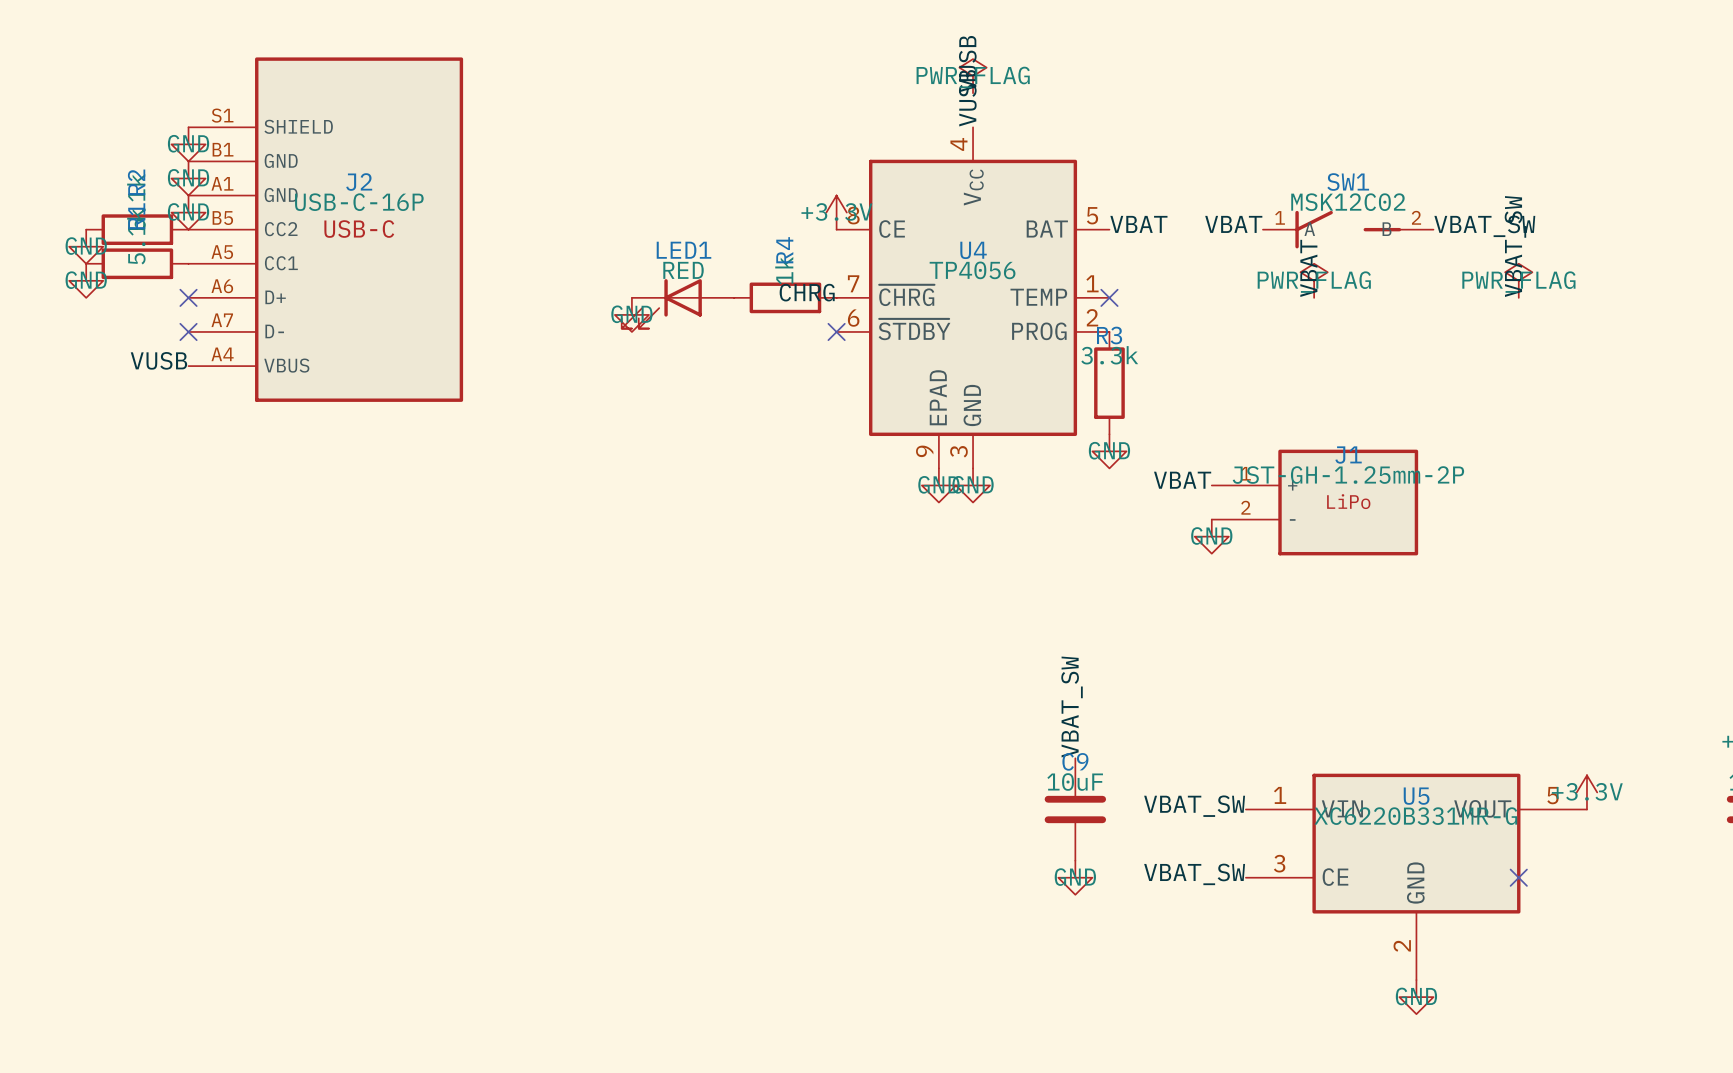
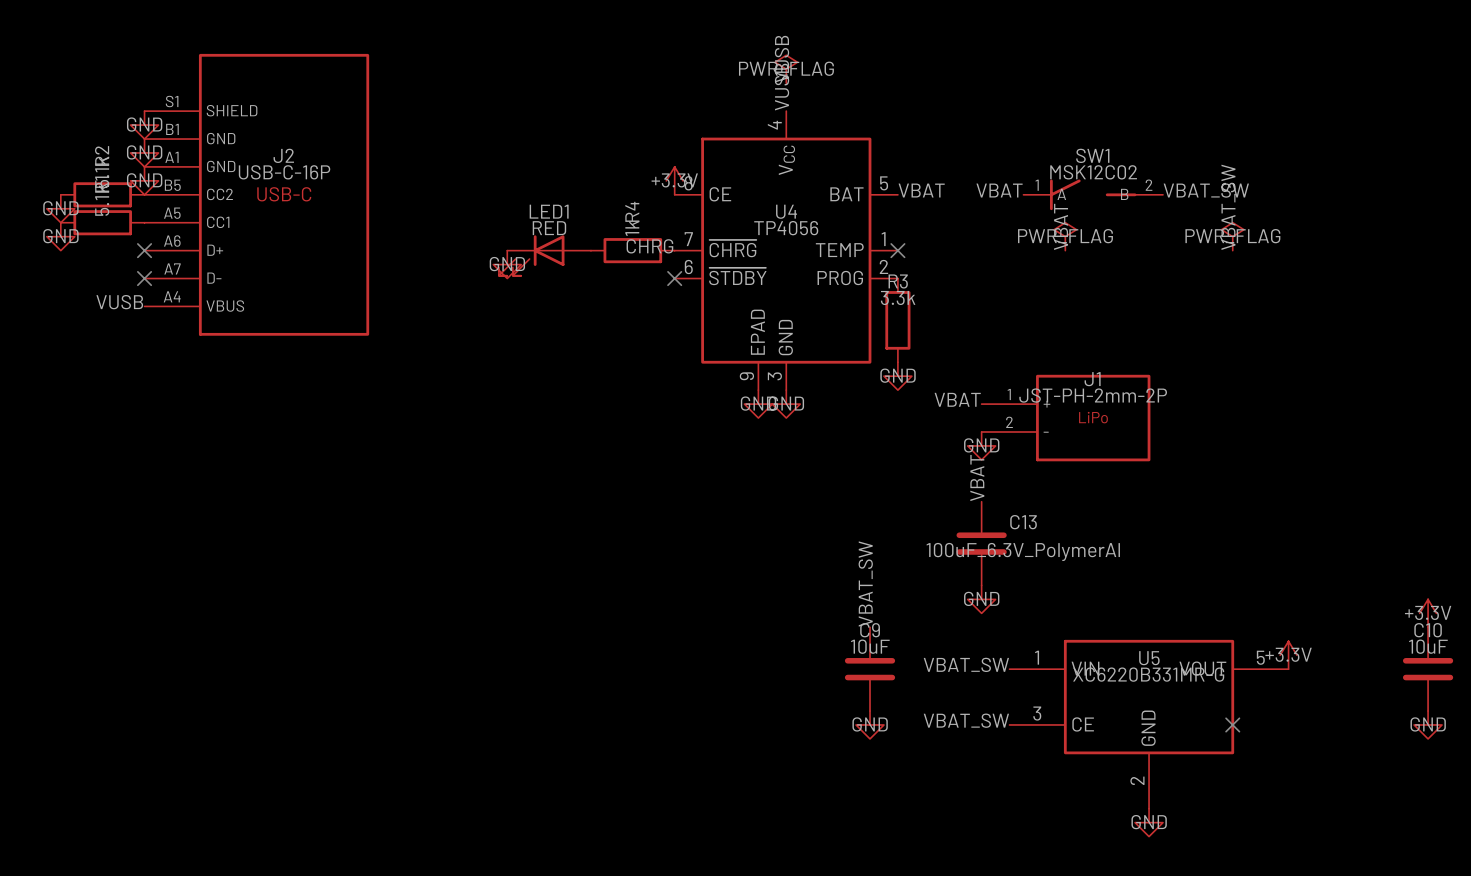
J1 value: JST-GH-1.25mm-2P (1348, 475) -> JST-PH-2mm-2P (1093, 395)
label: none -> VBAT (977, 478)
C13: none -> 100uF_6.3V_PolymerAl (981, 543)
power symbol: none -> GND (981, 599)

